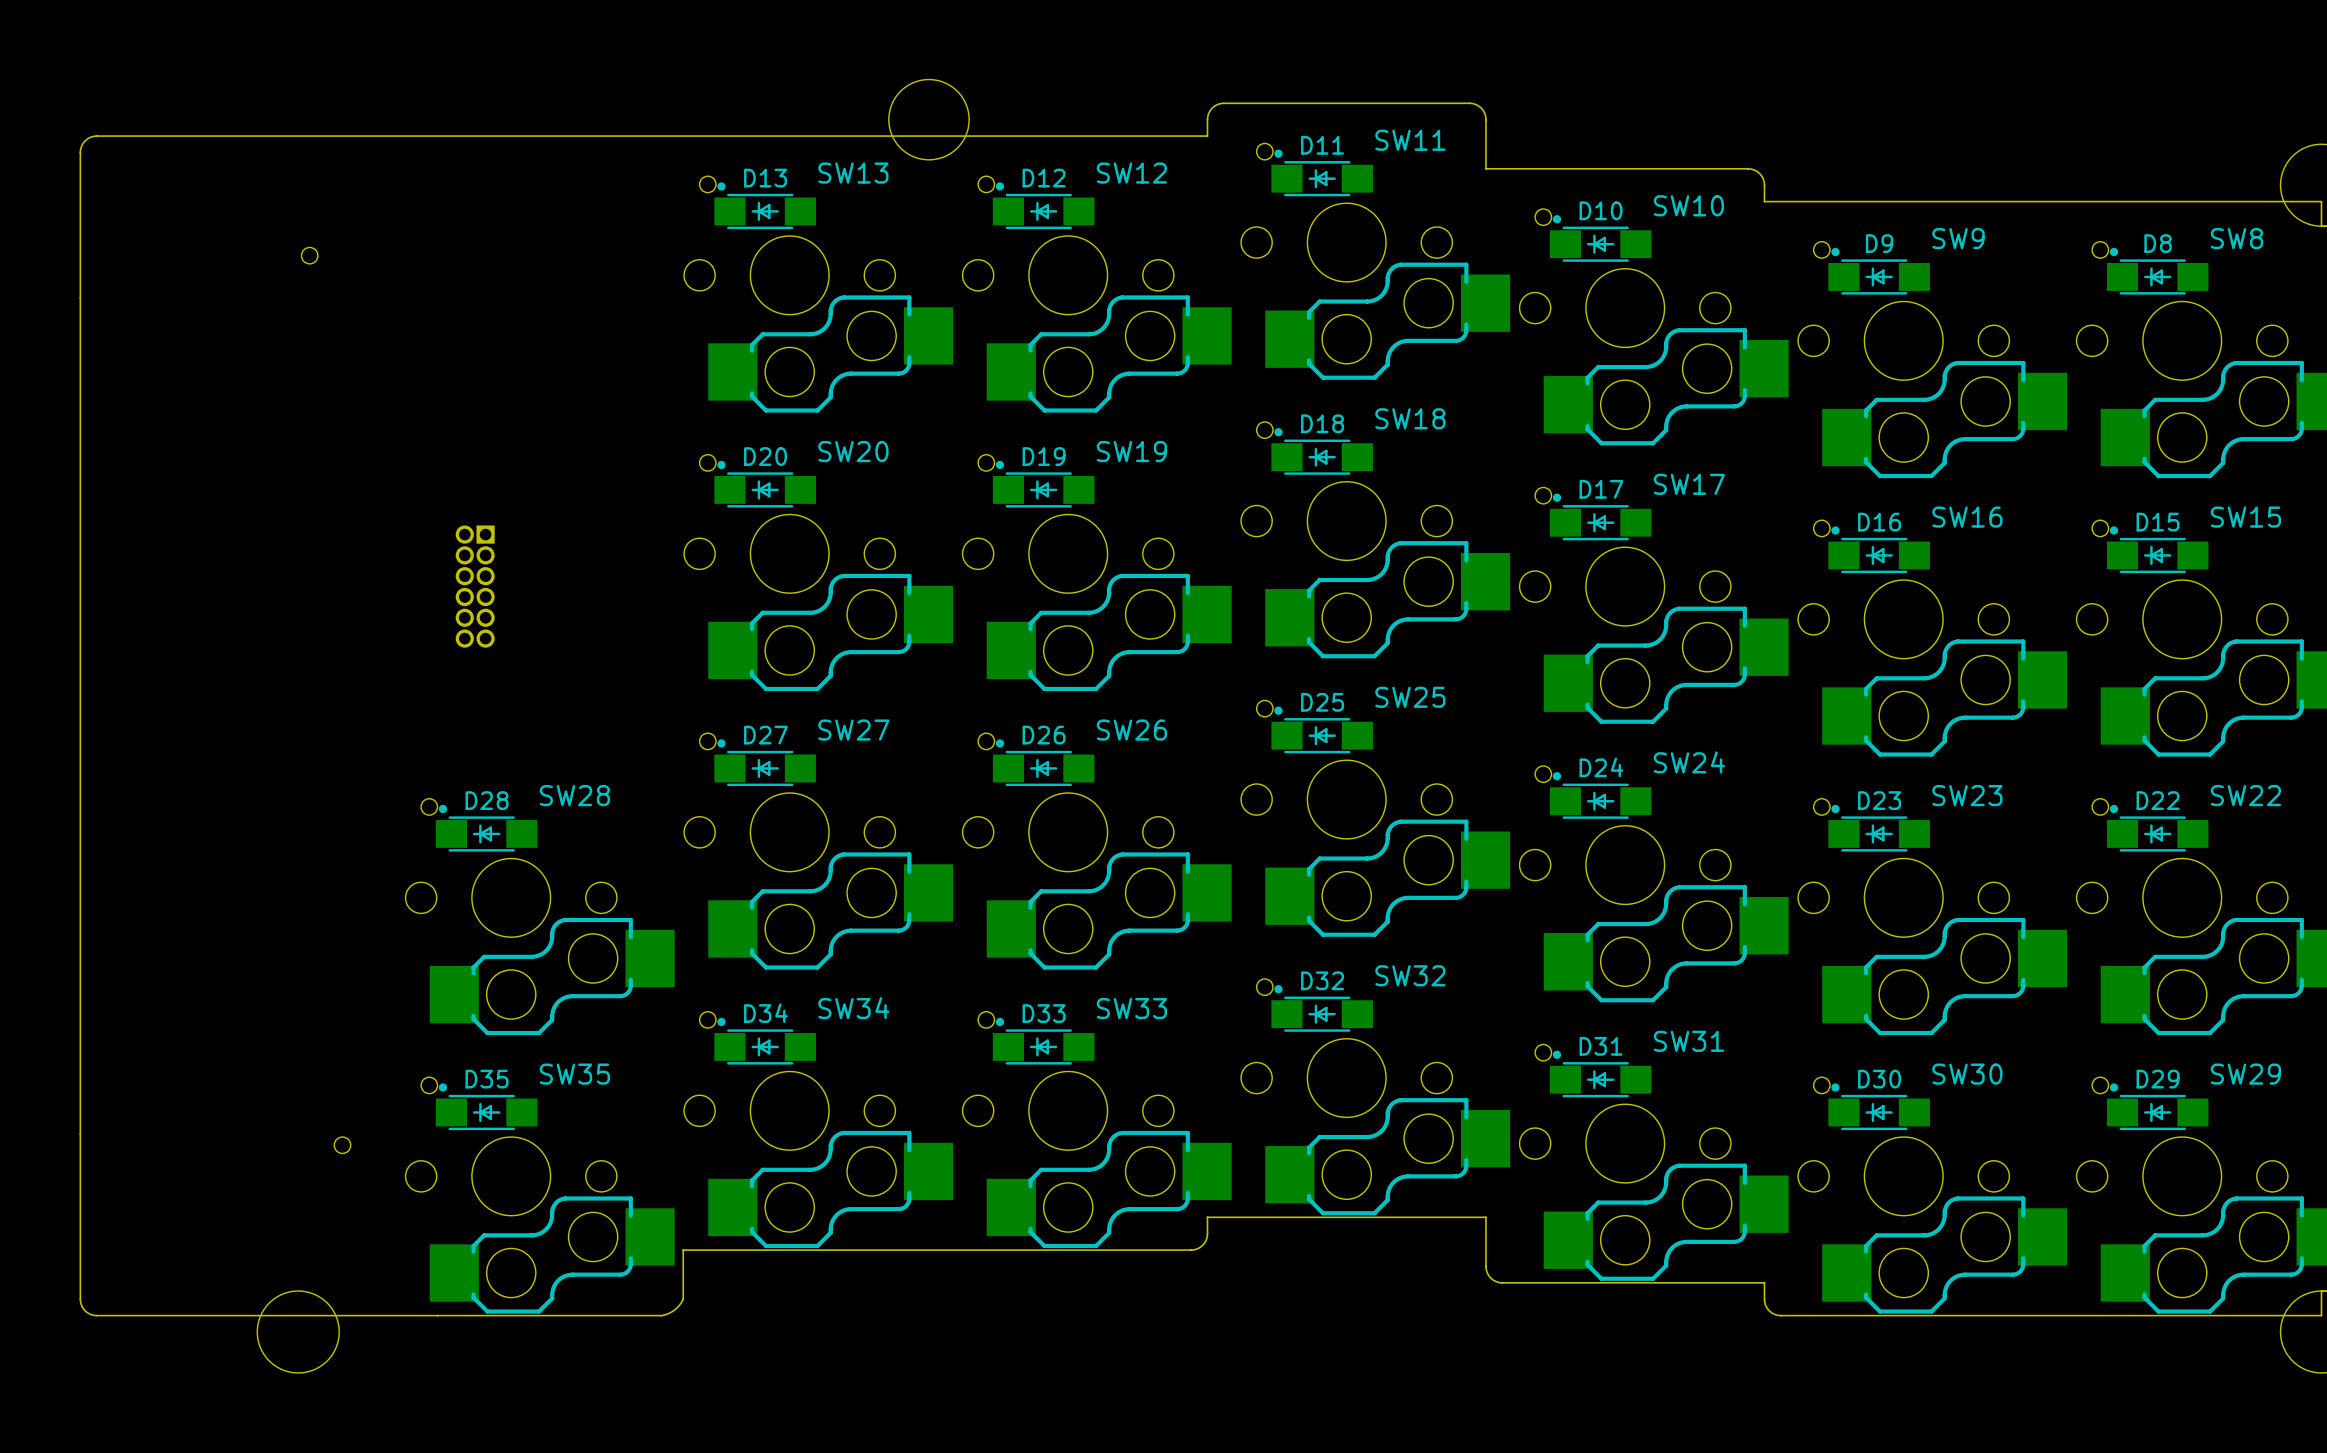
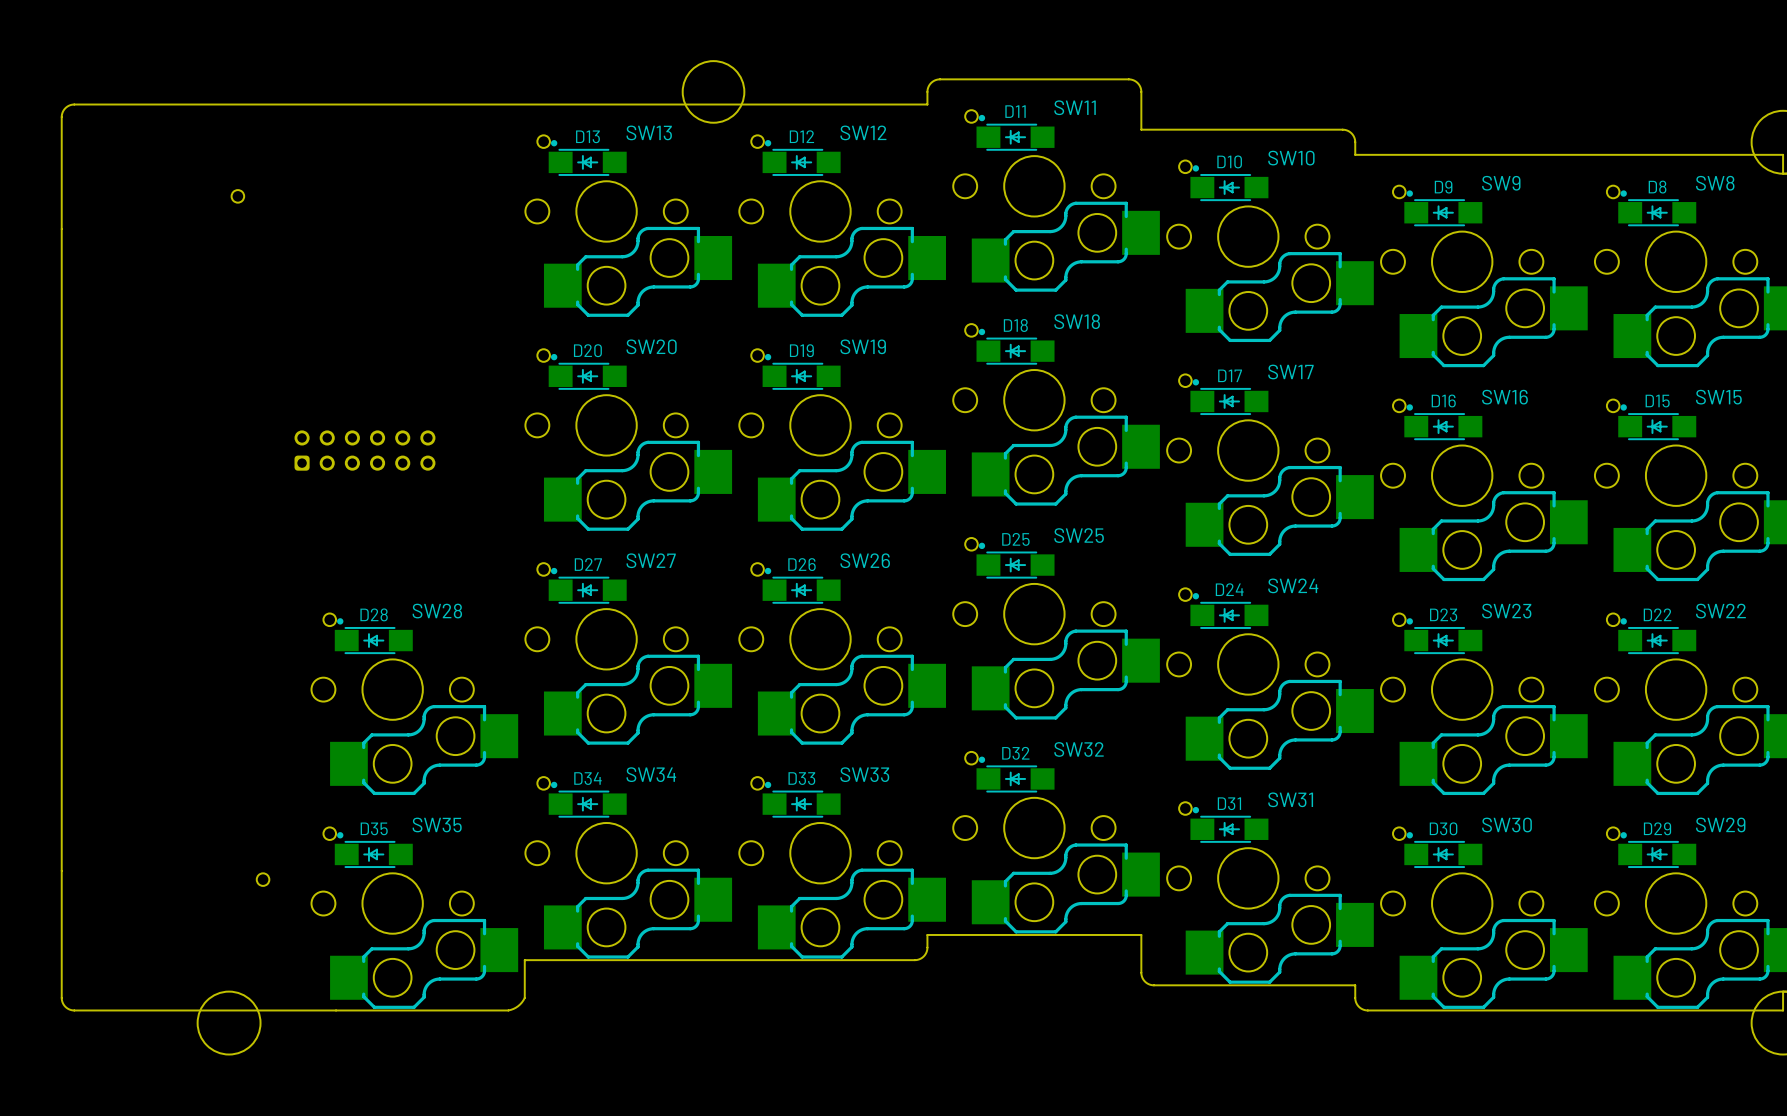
part footprint: [455, 525, 495, 648] -> [294, 430, 436, 471]

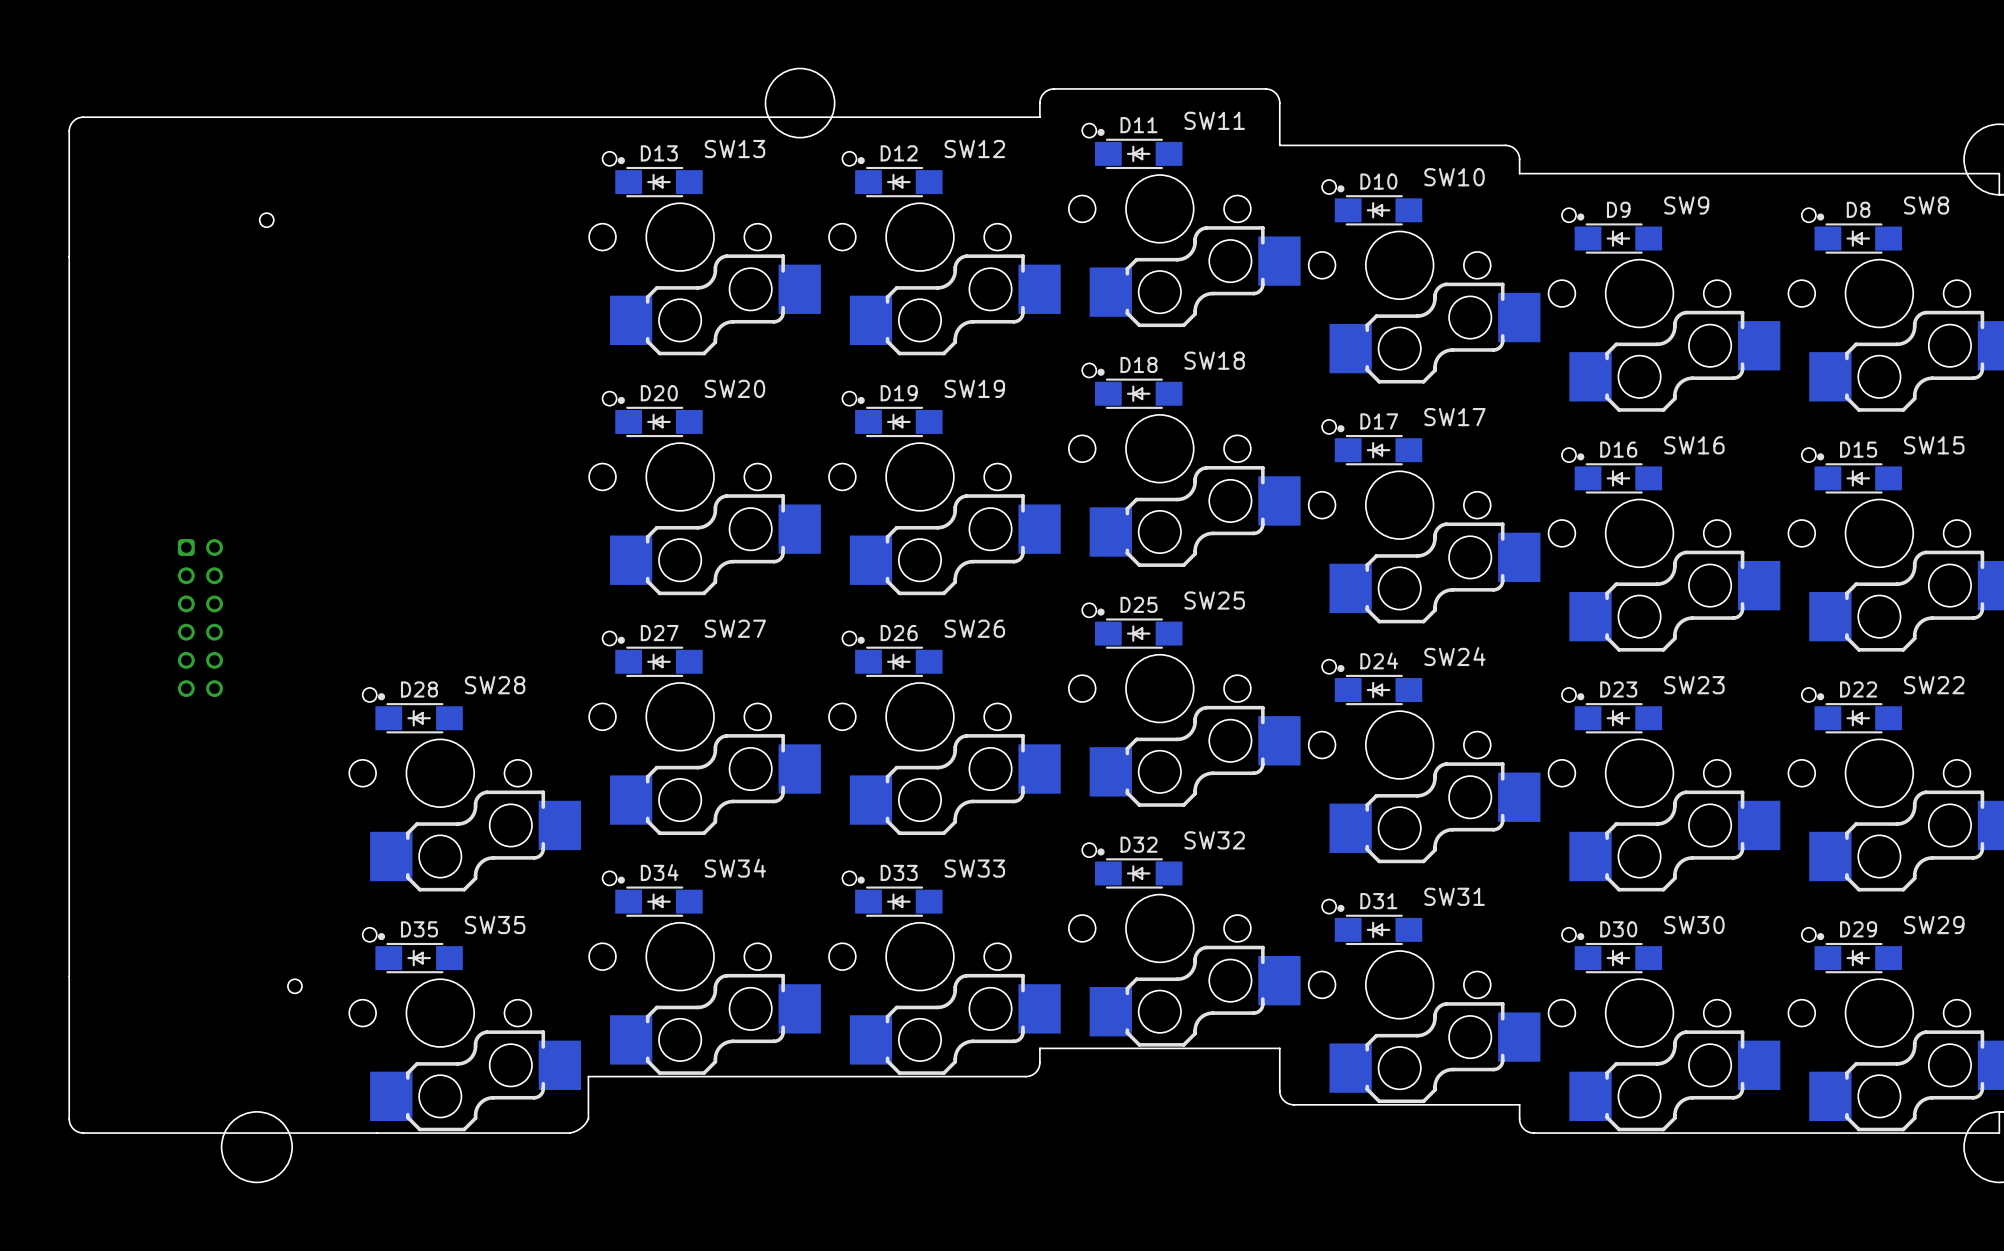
part rotation: 0° (364, 450) -> 90° clockwise (200, 618)
part position: (364, 450) -> (200, 618)

